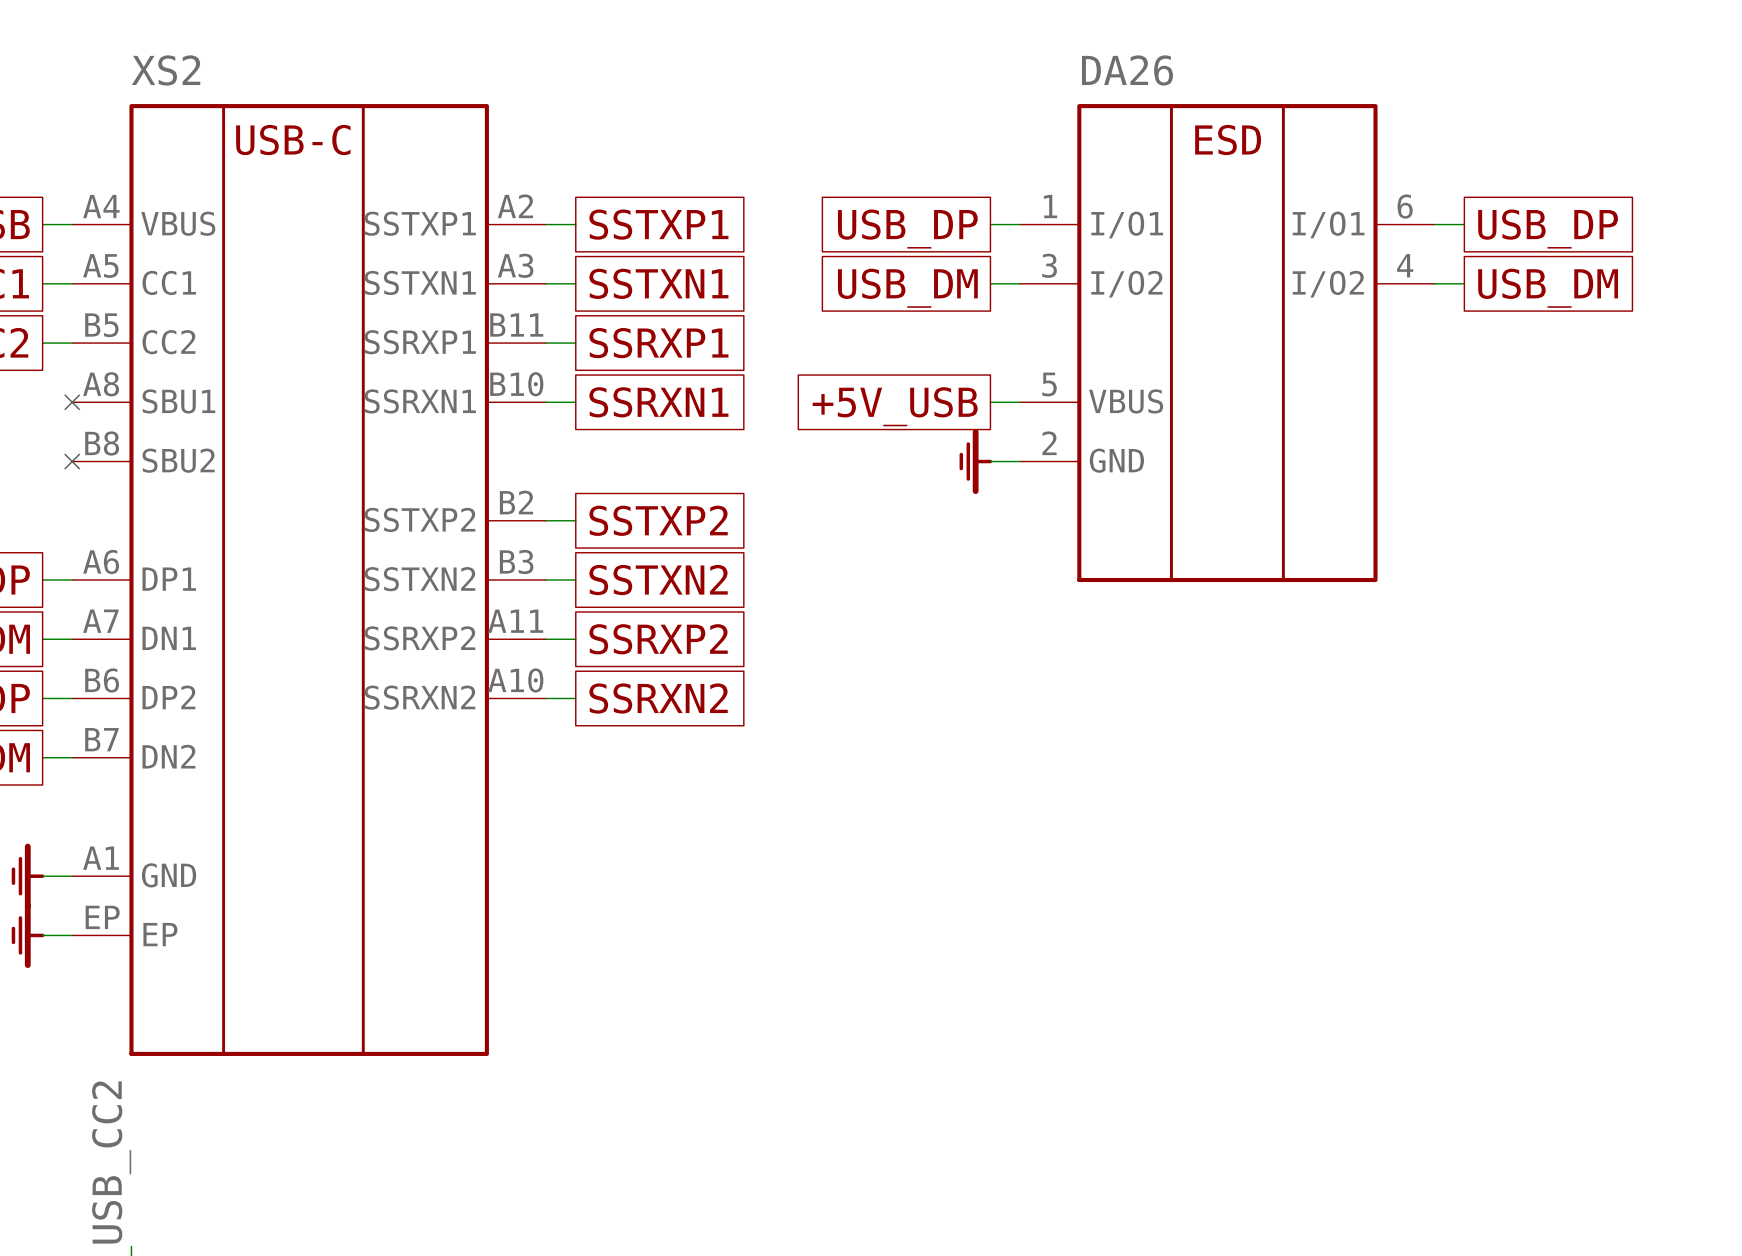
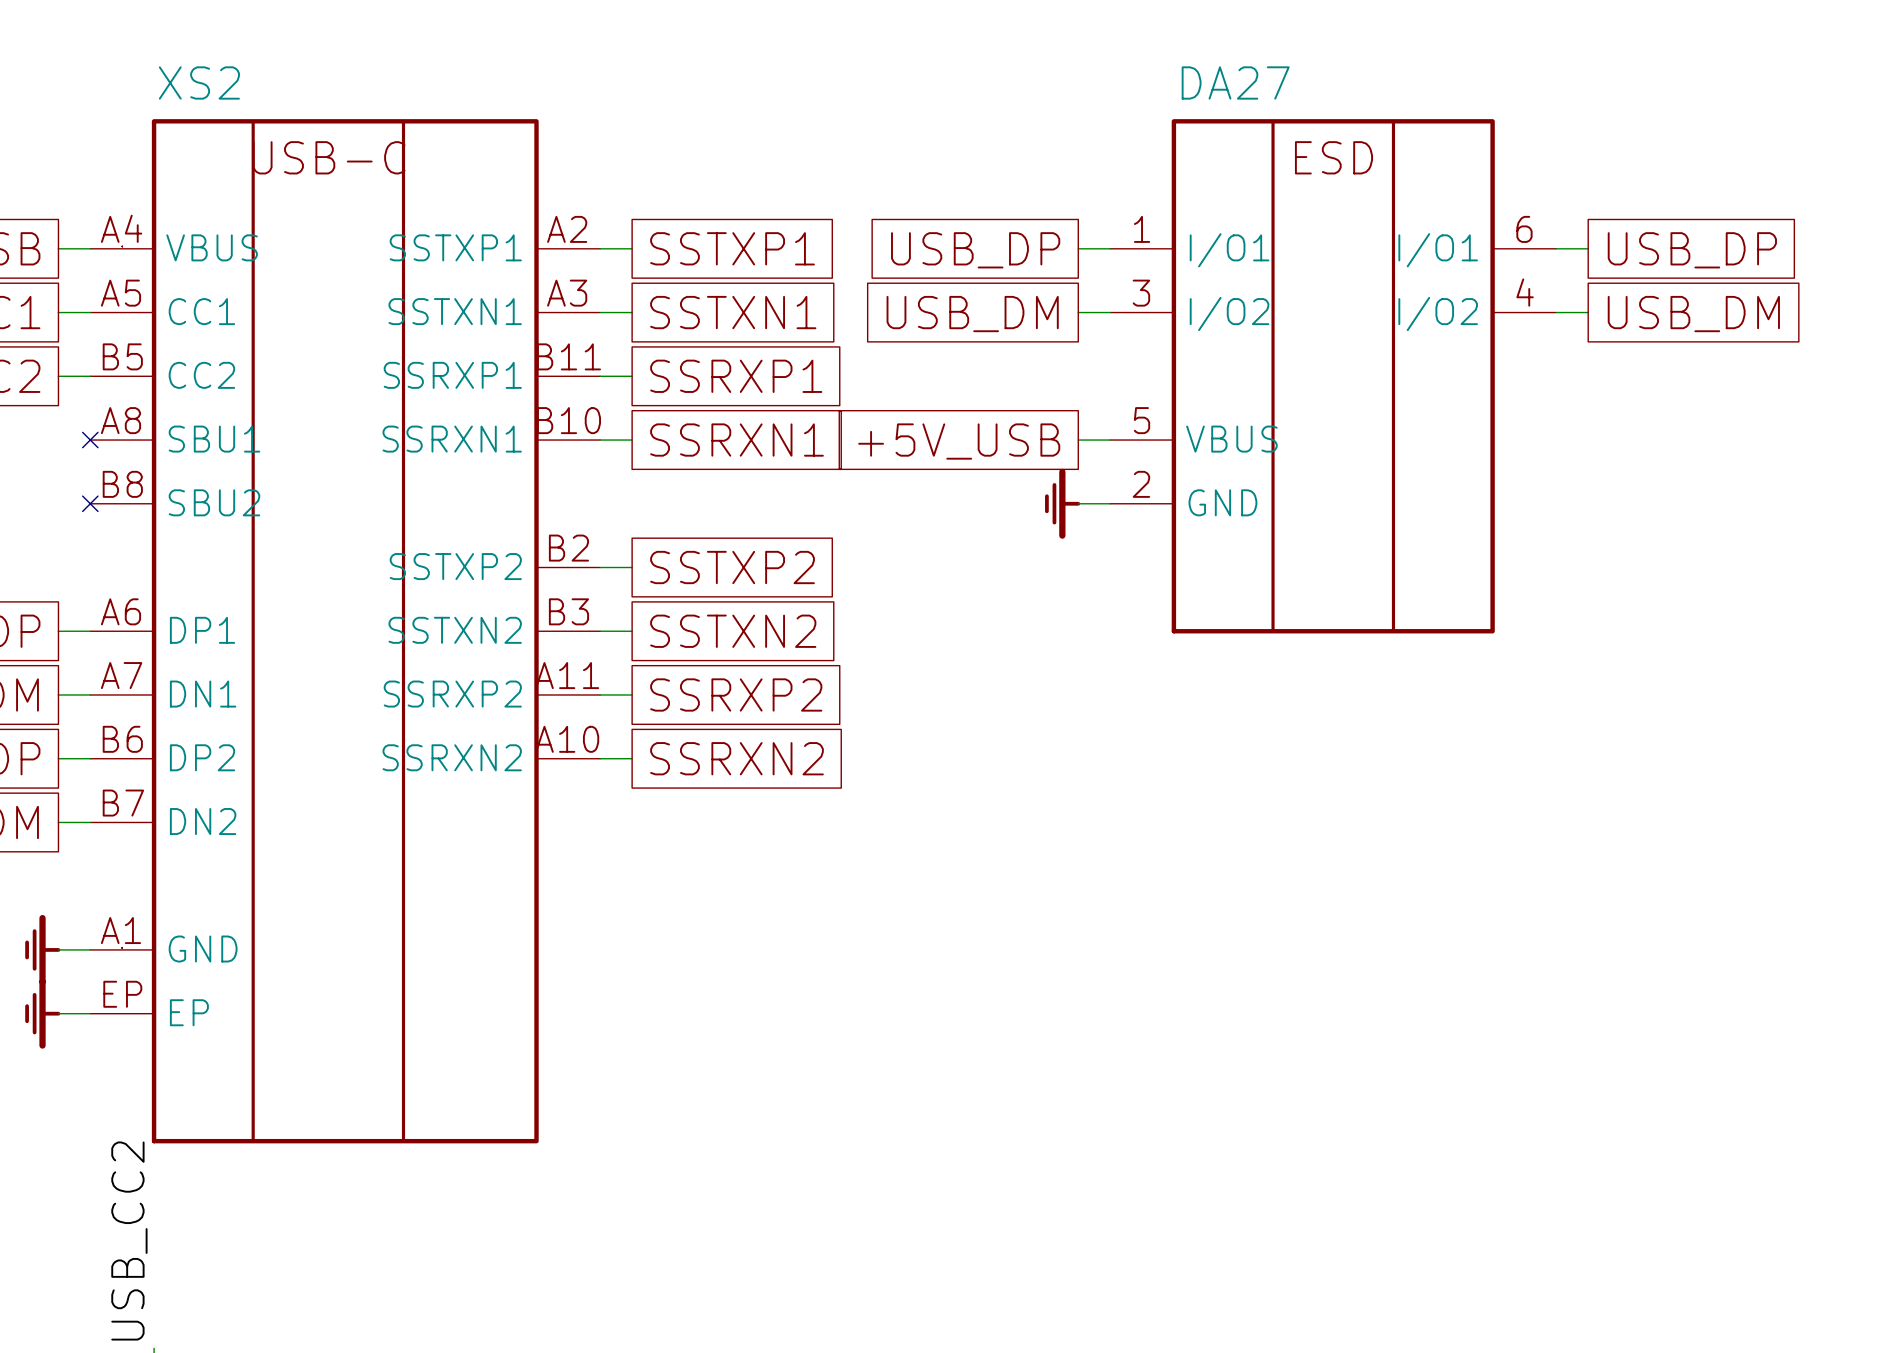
DA26 name: DA26 (1127, 70) -> DA27 (1235, 82)

